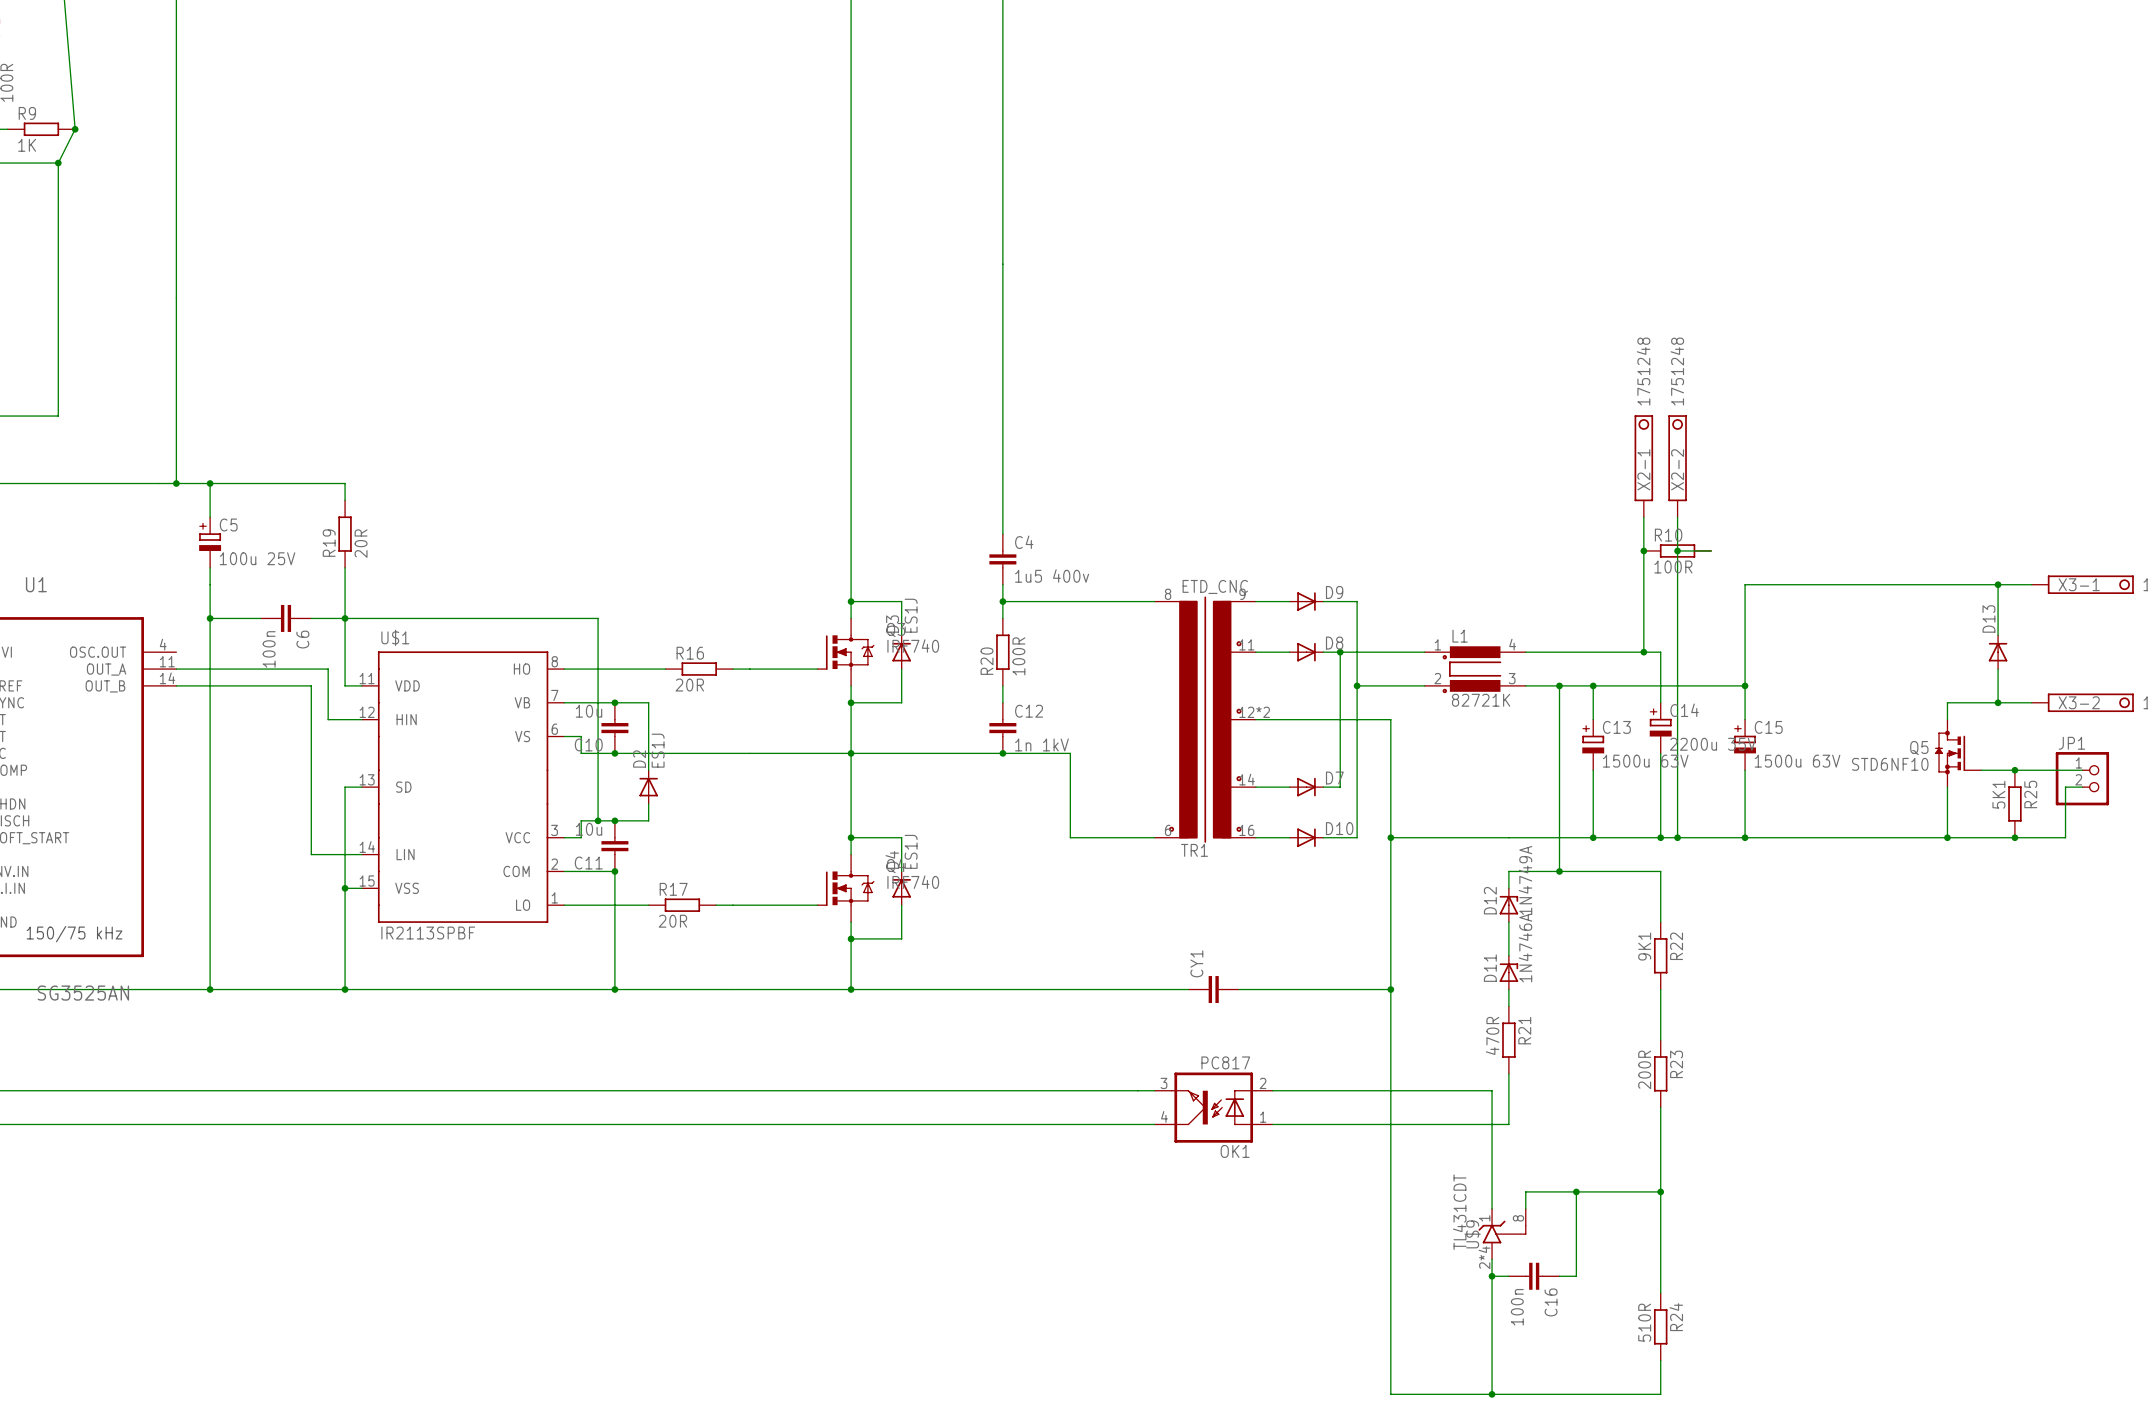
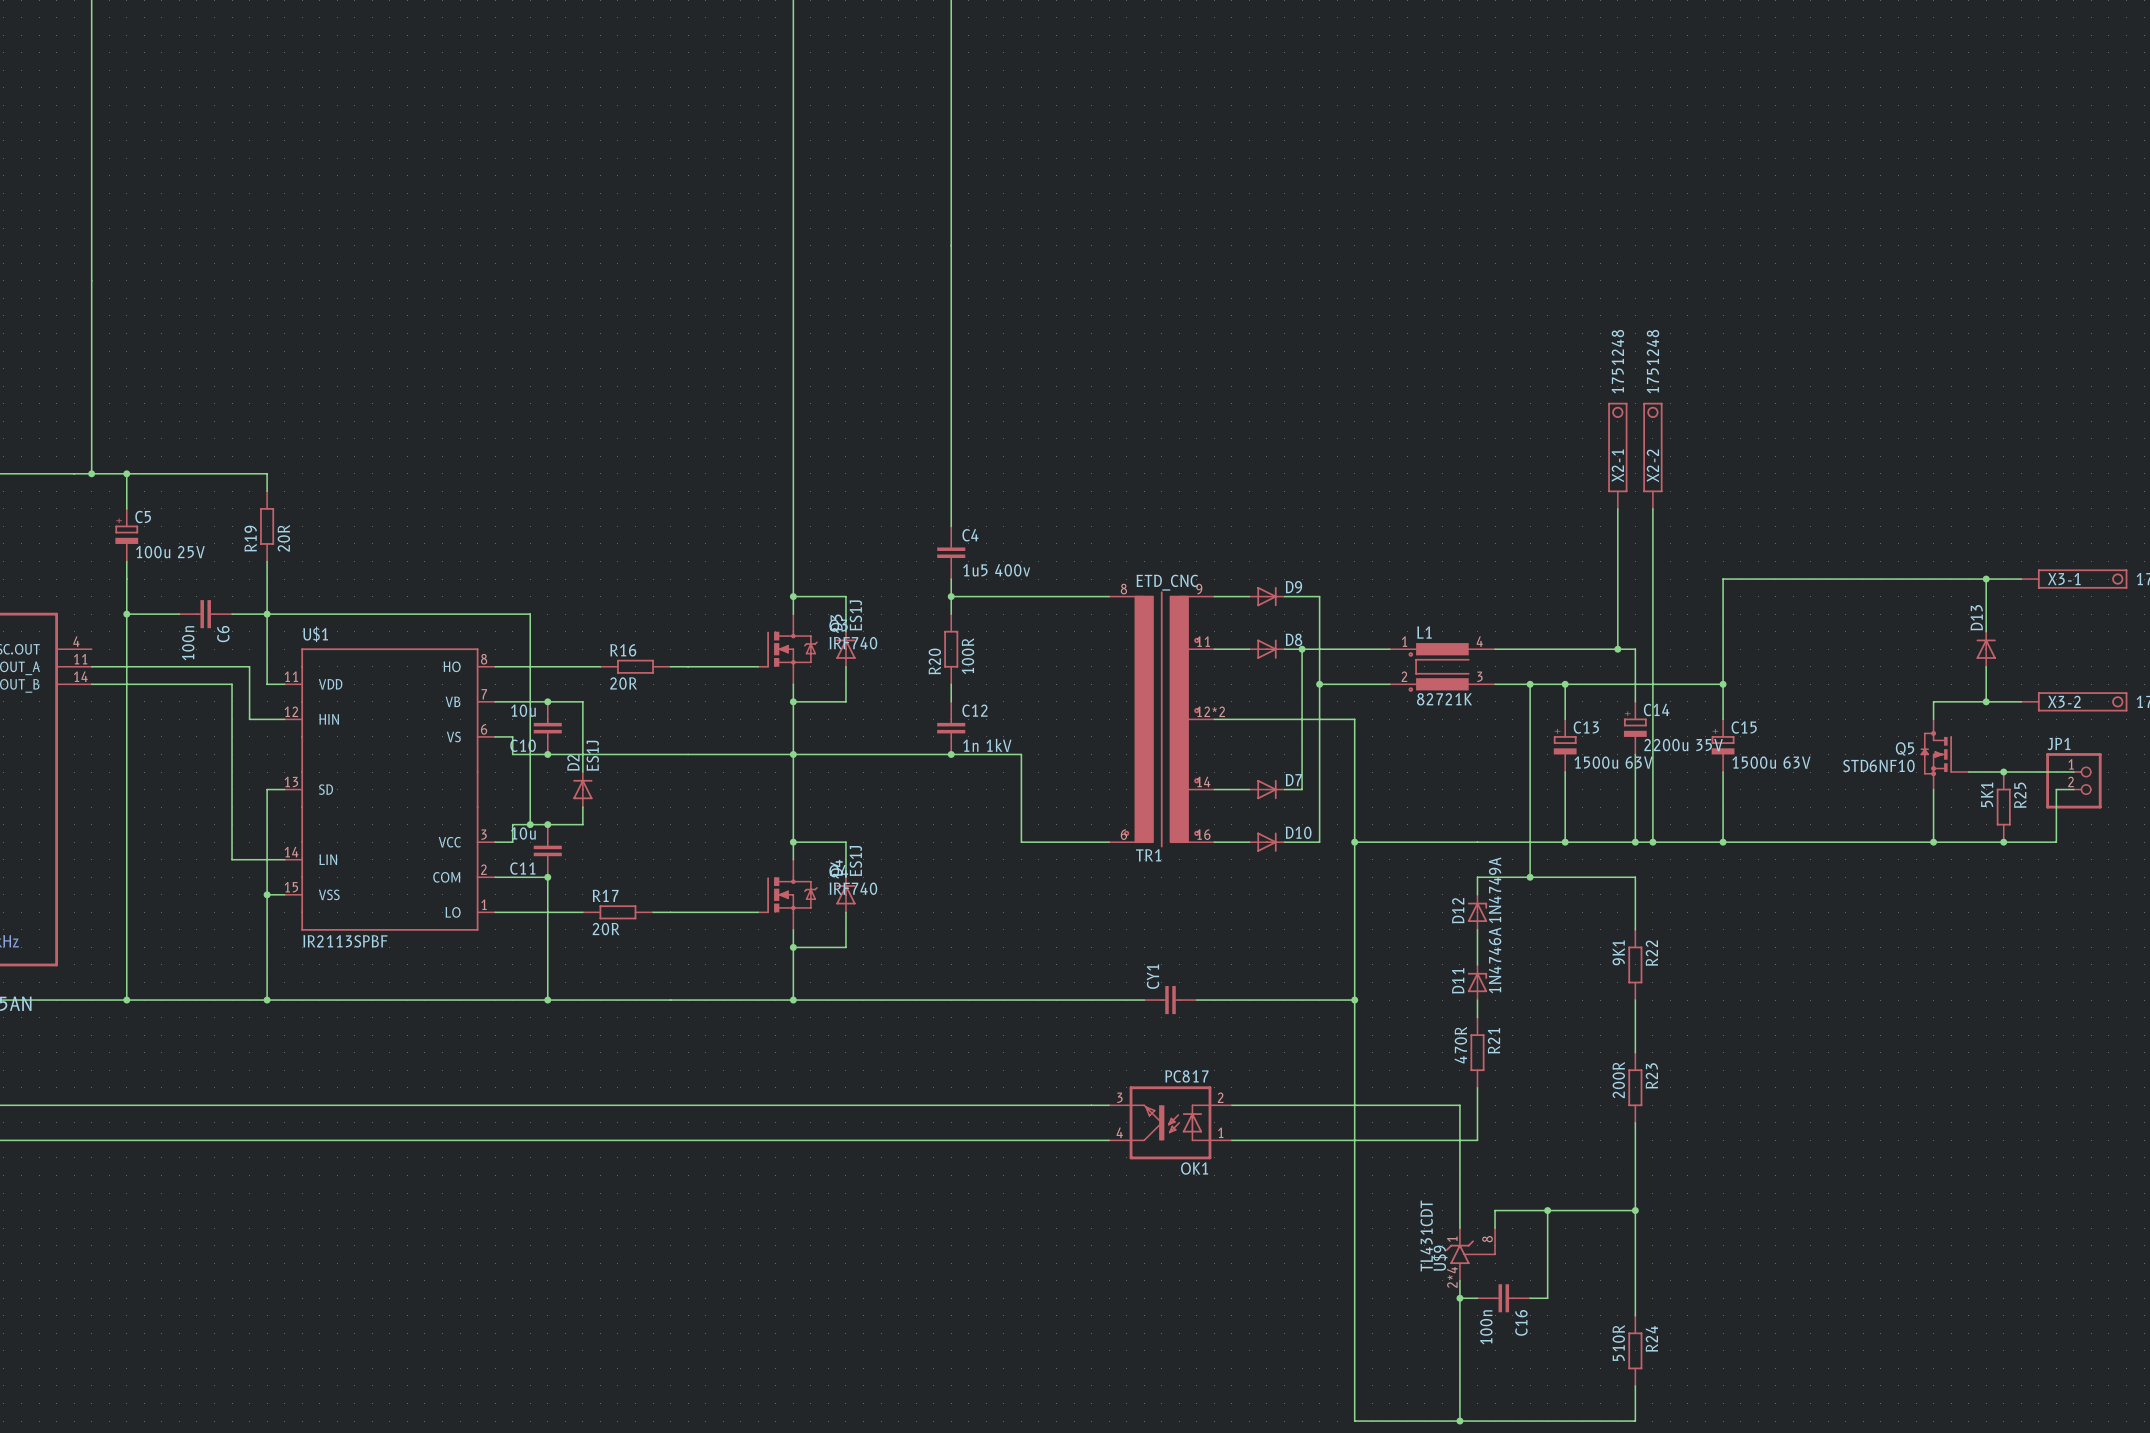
junction: (1643, 550) -> none
wire: (1677, 550) (1711, 550) -> none
R10: 100R (1677, 550) -> none
junction: (1677, 550) -> none

